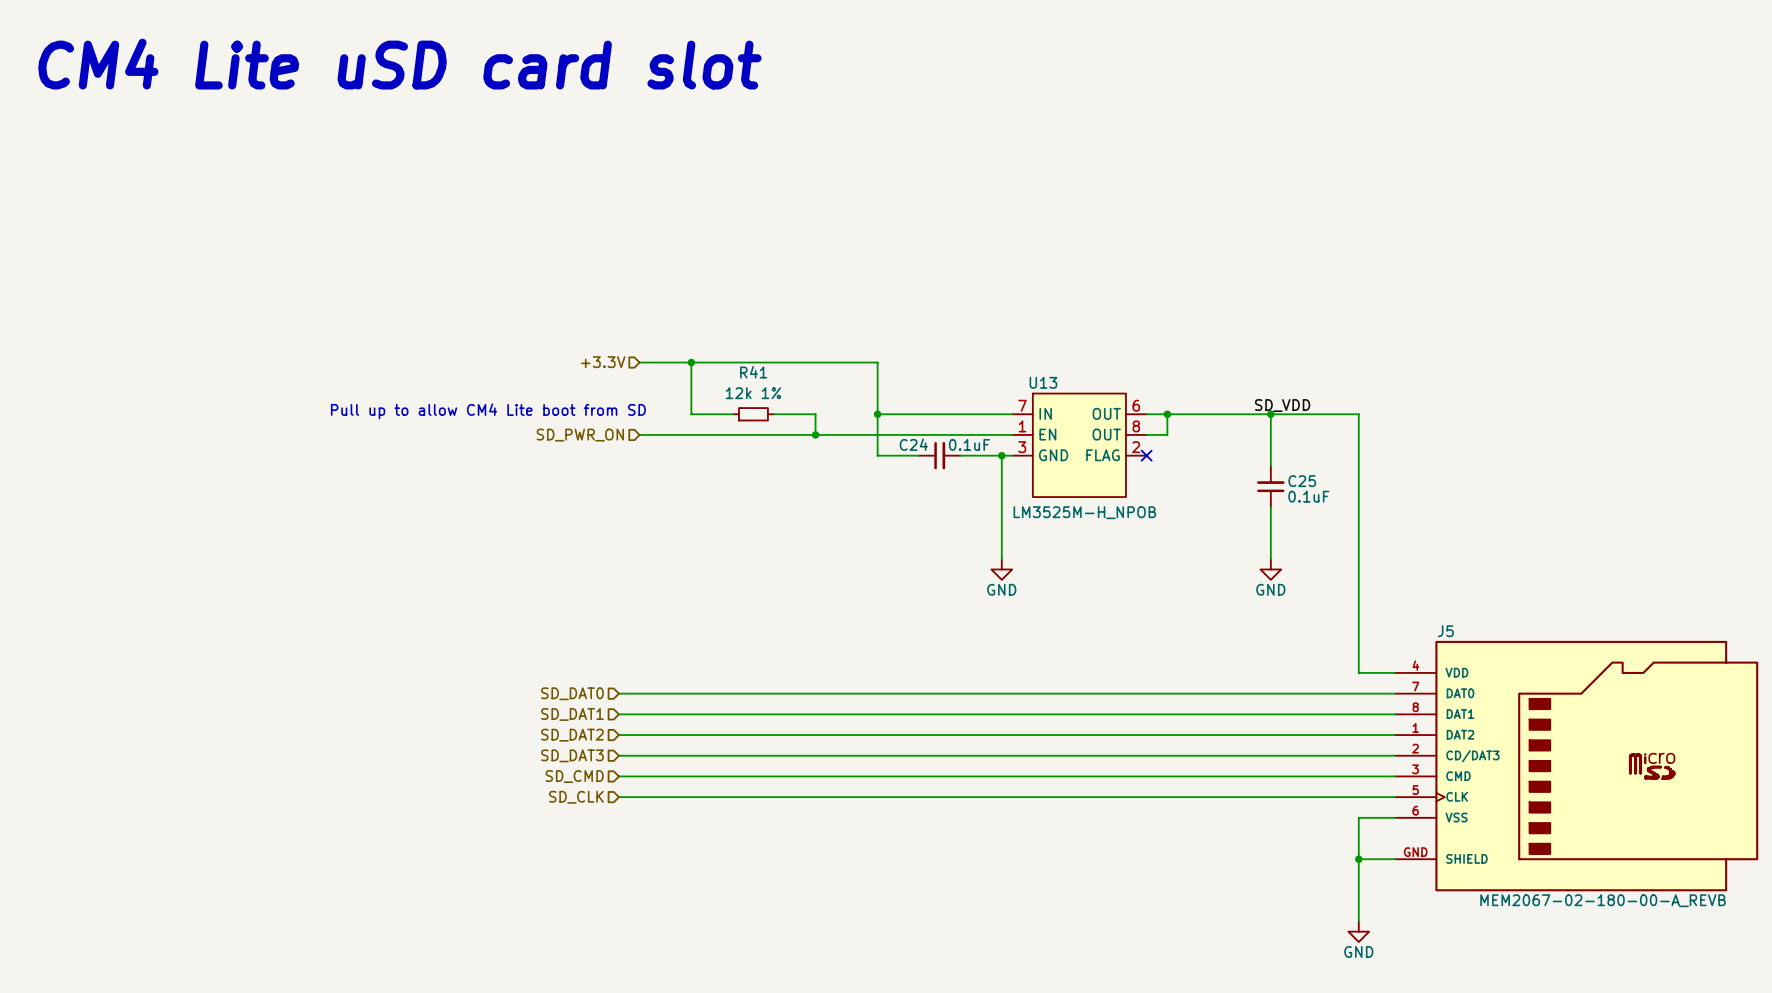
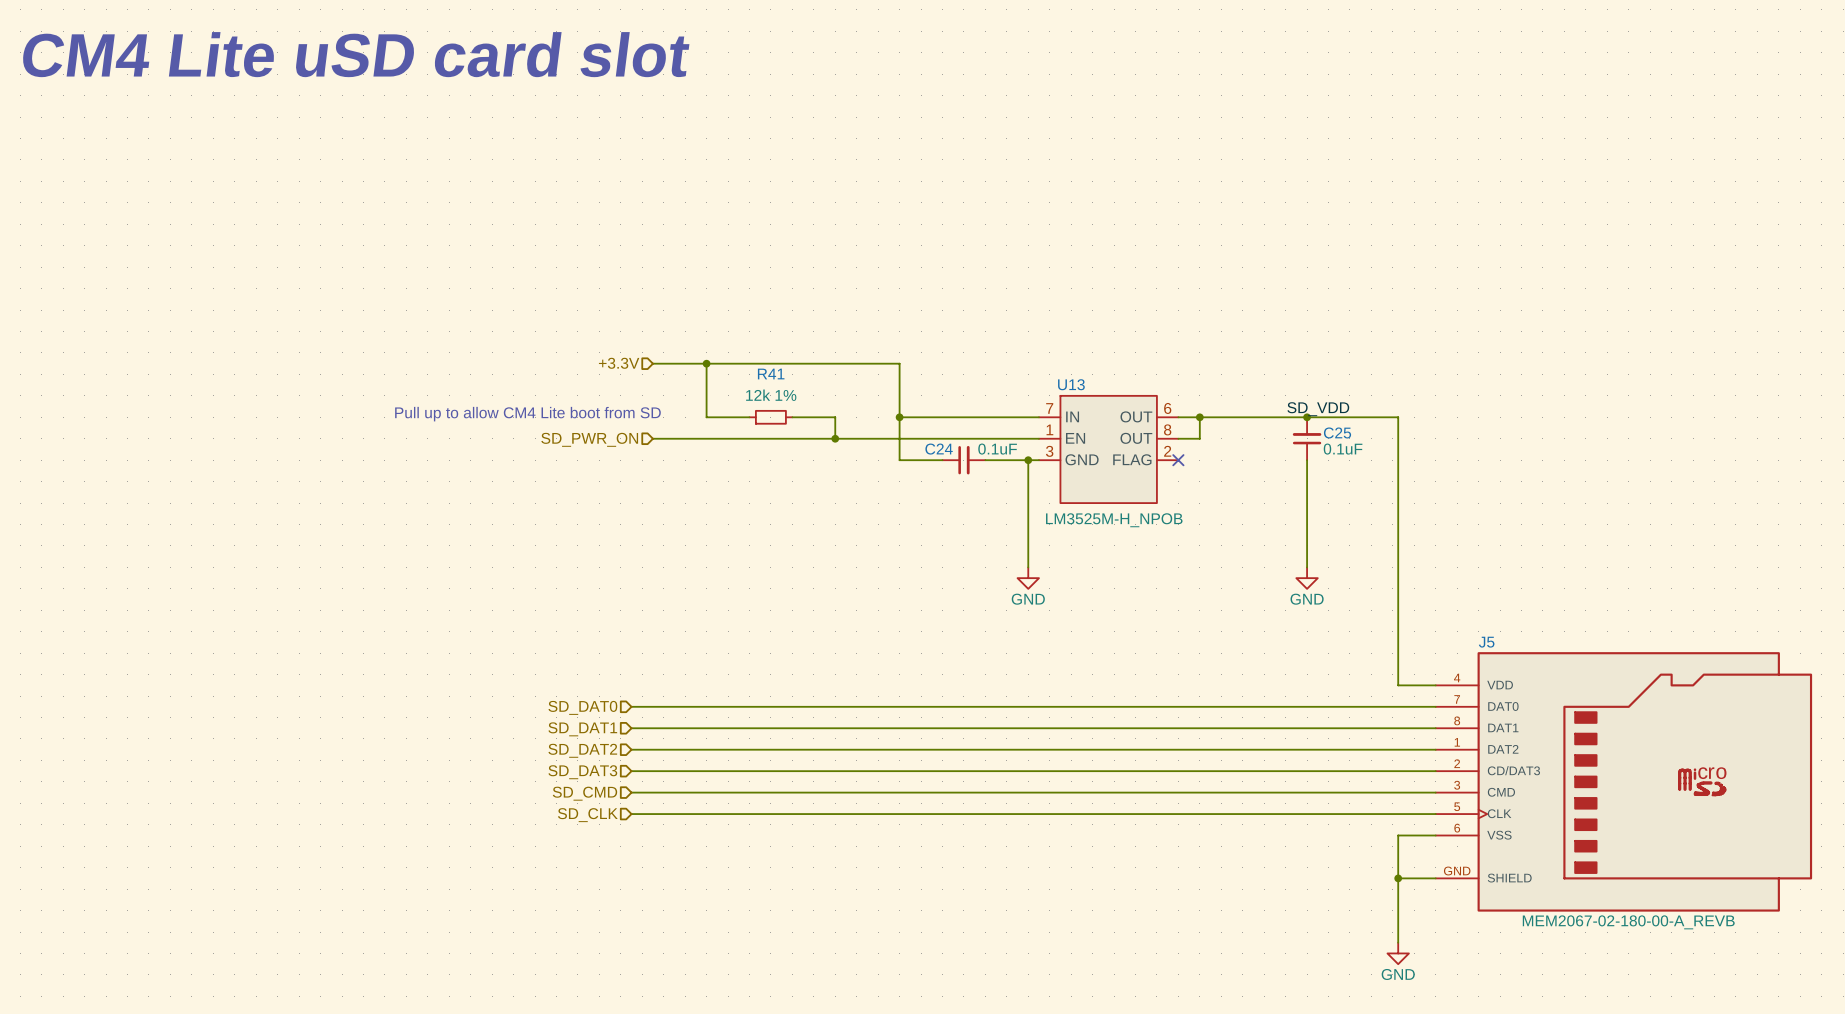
C25 position: (1270, 486) -> (1307, 438)

